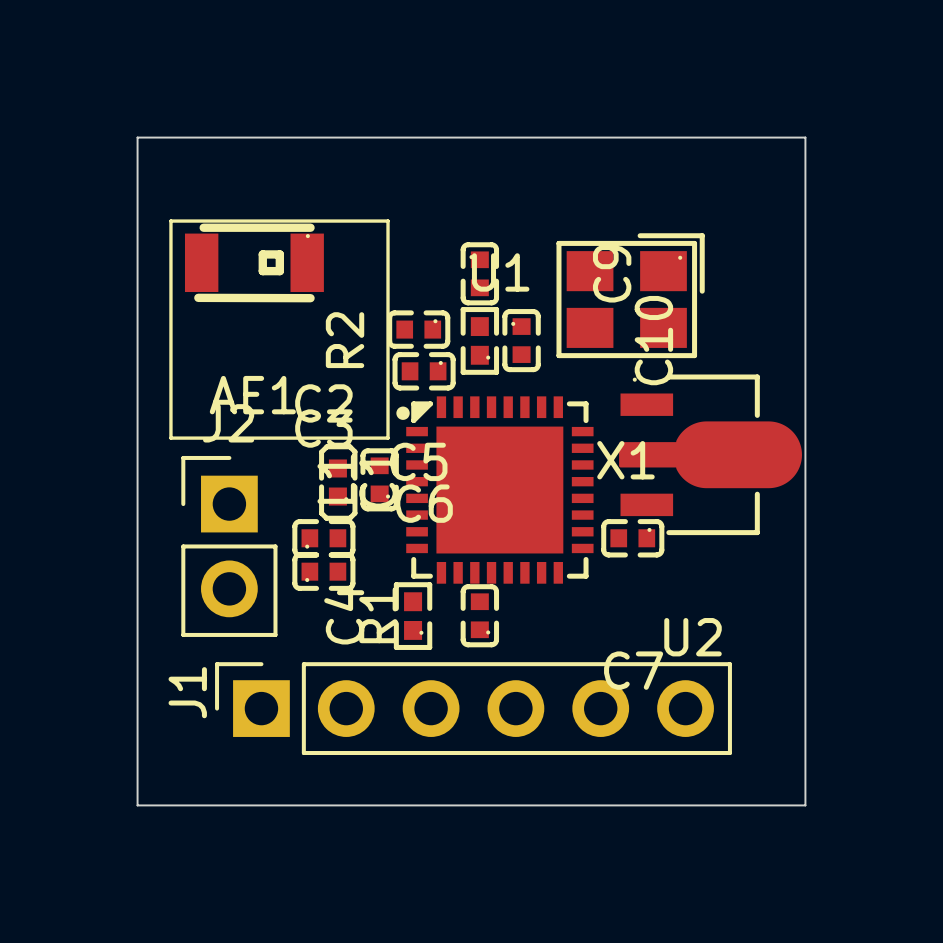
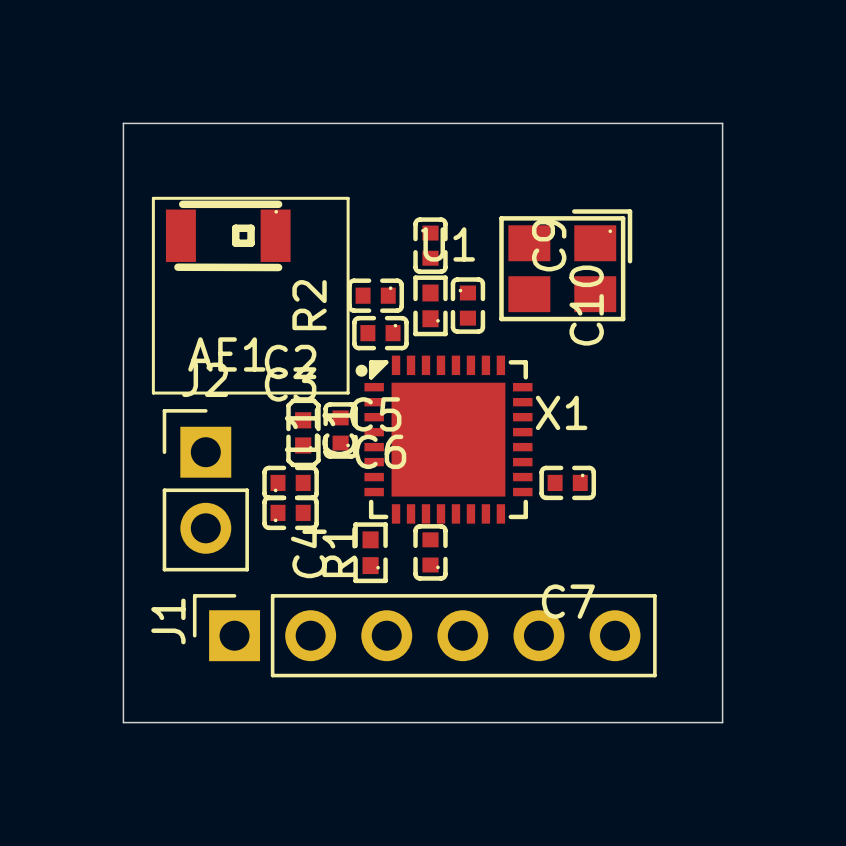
U2: (710, 454) -> none

